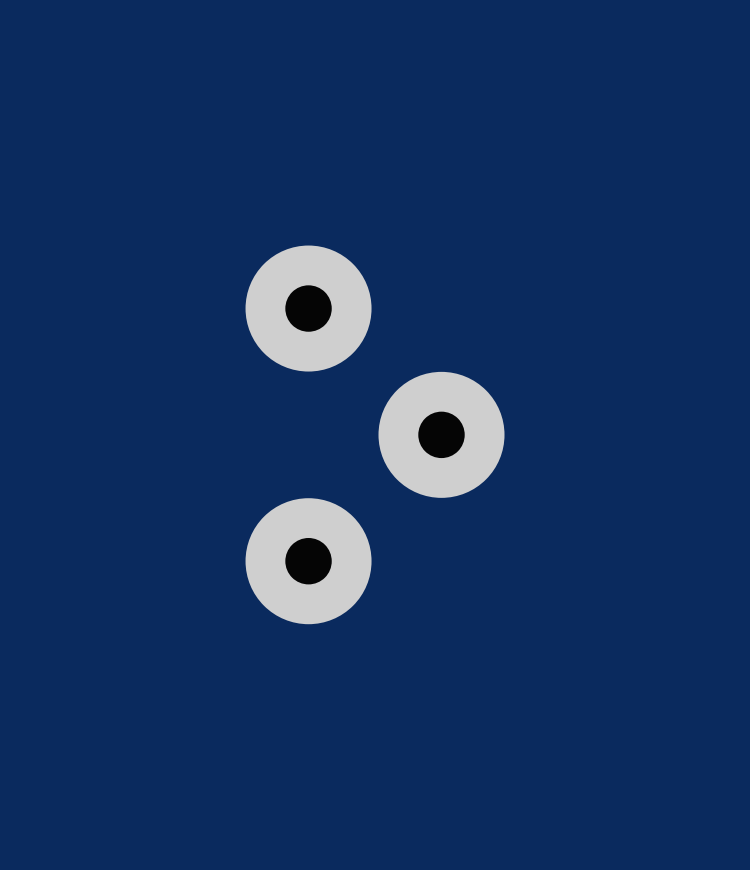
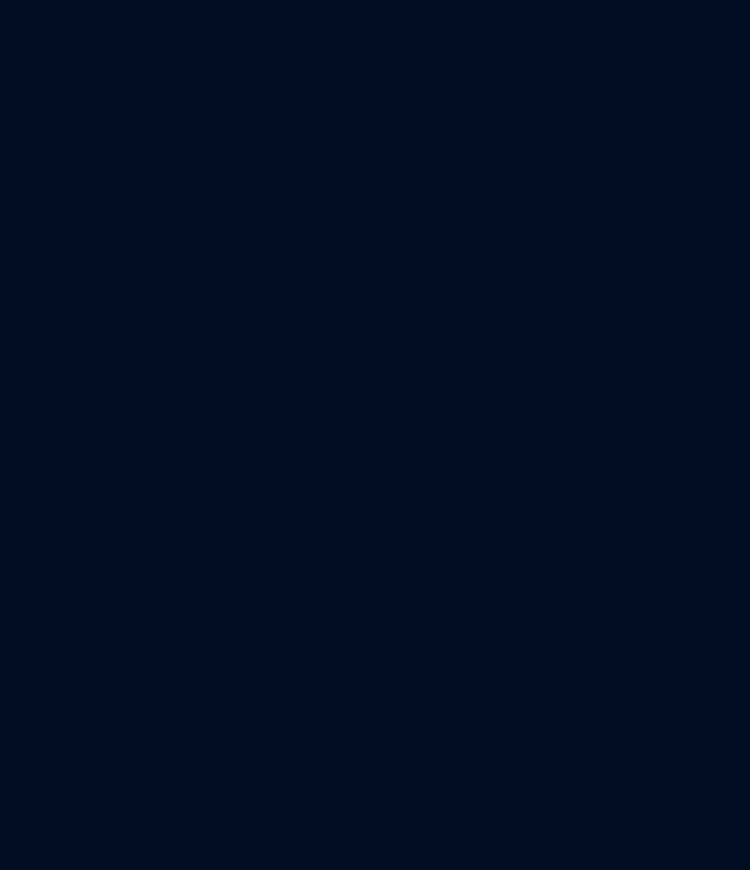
part: (375, 434) -> none

